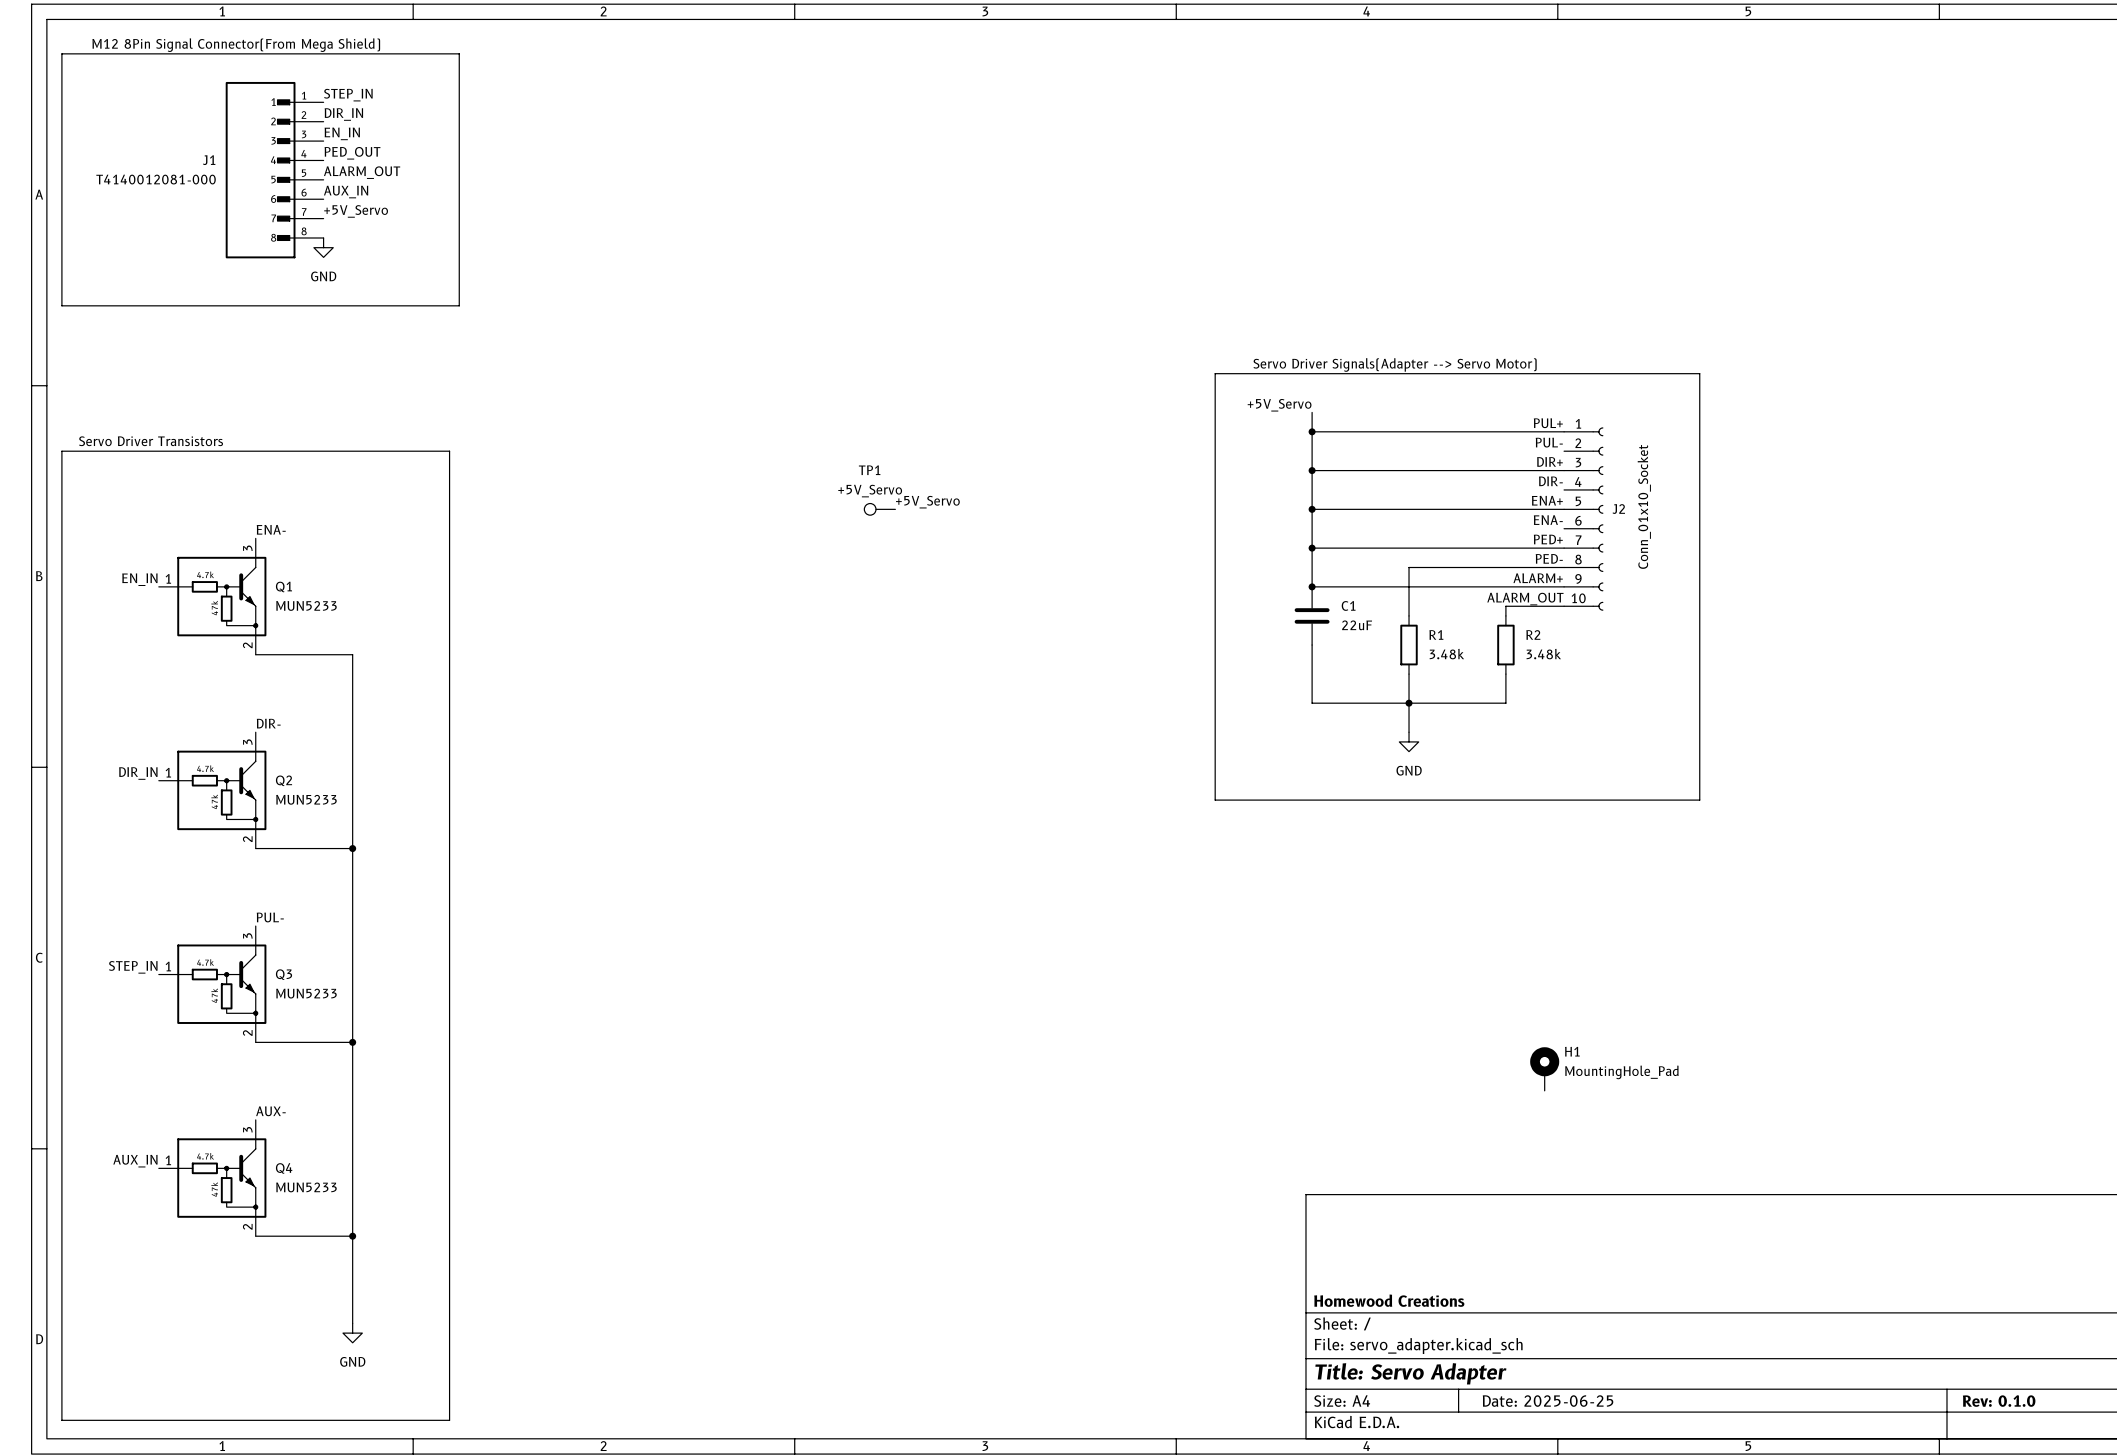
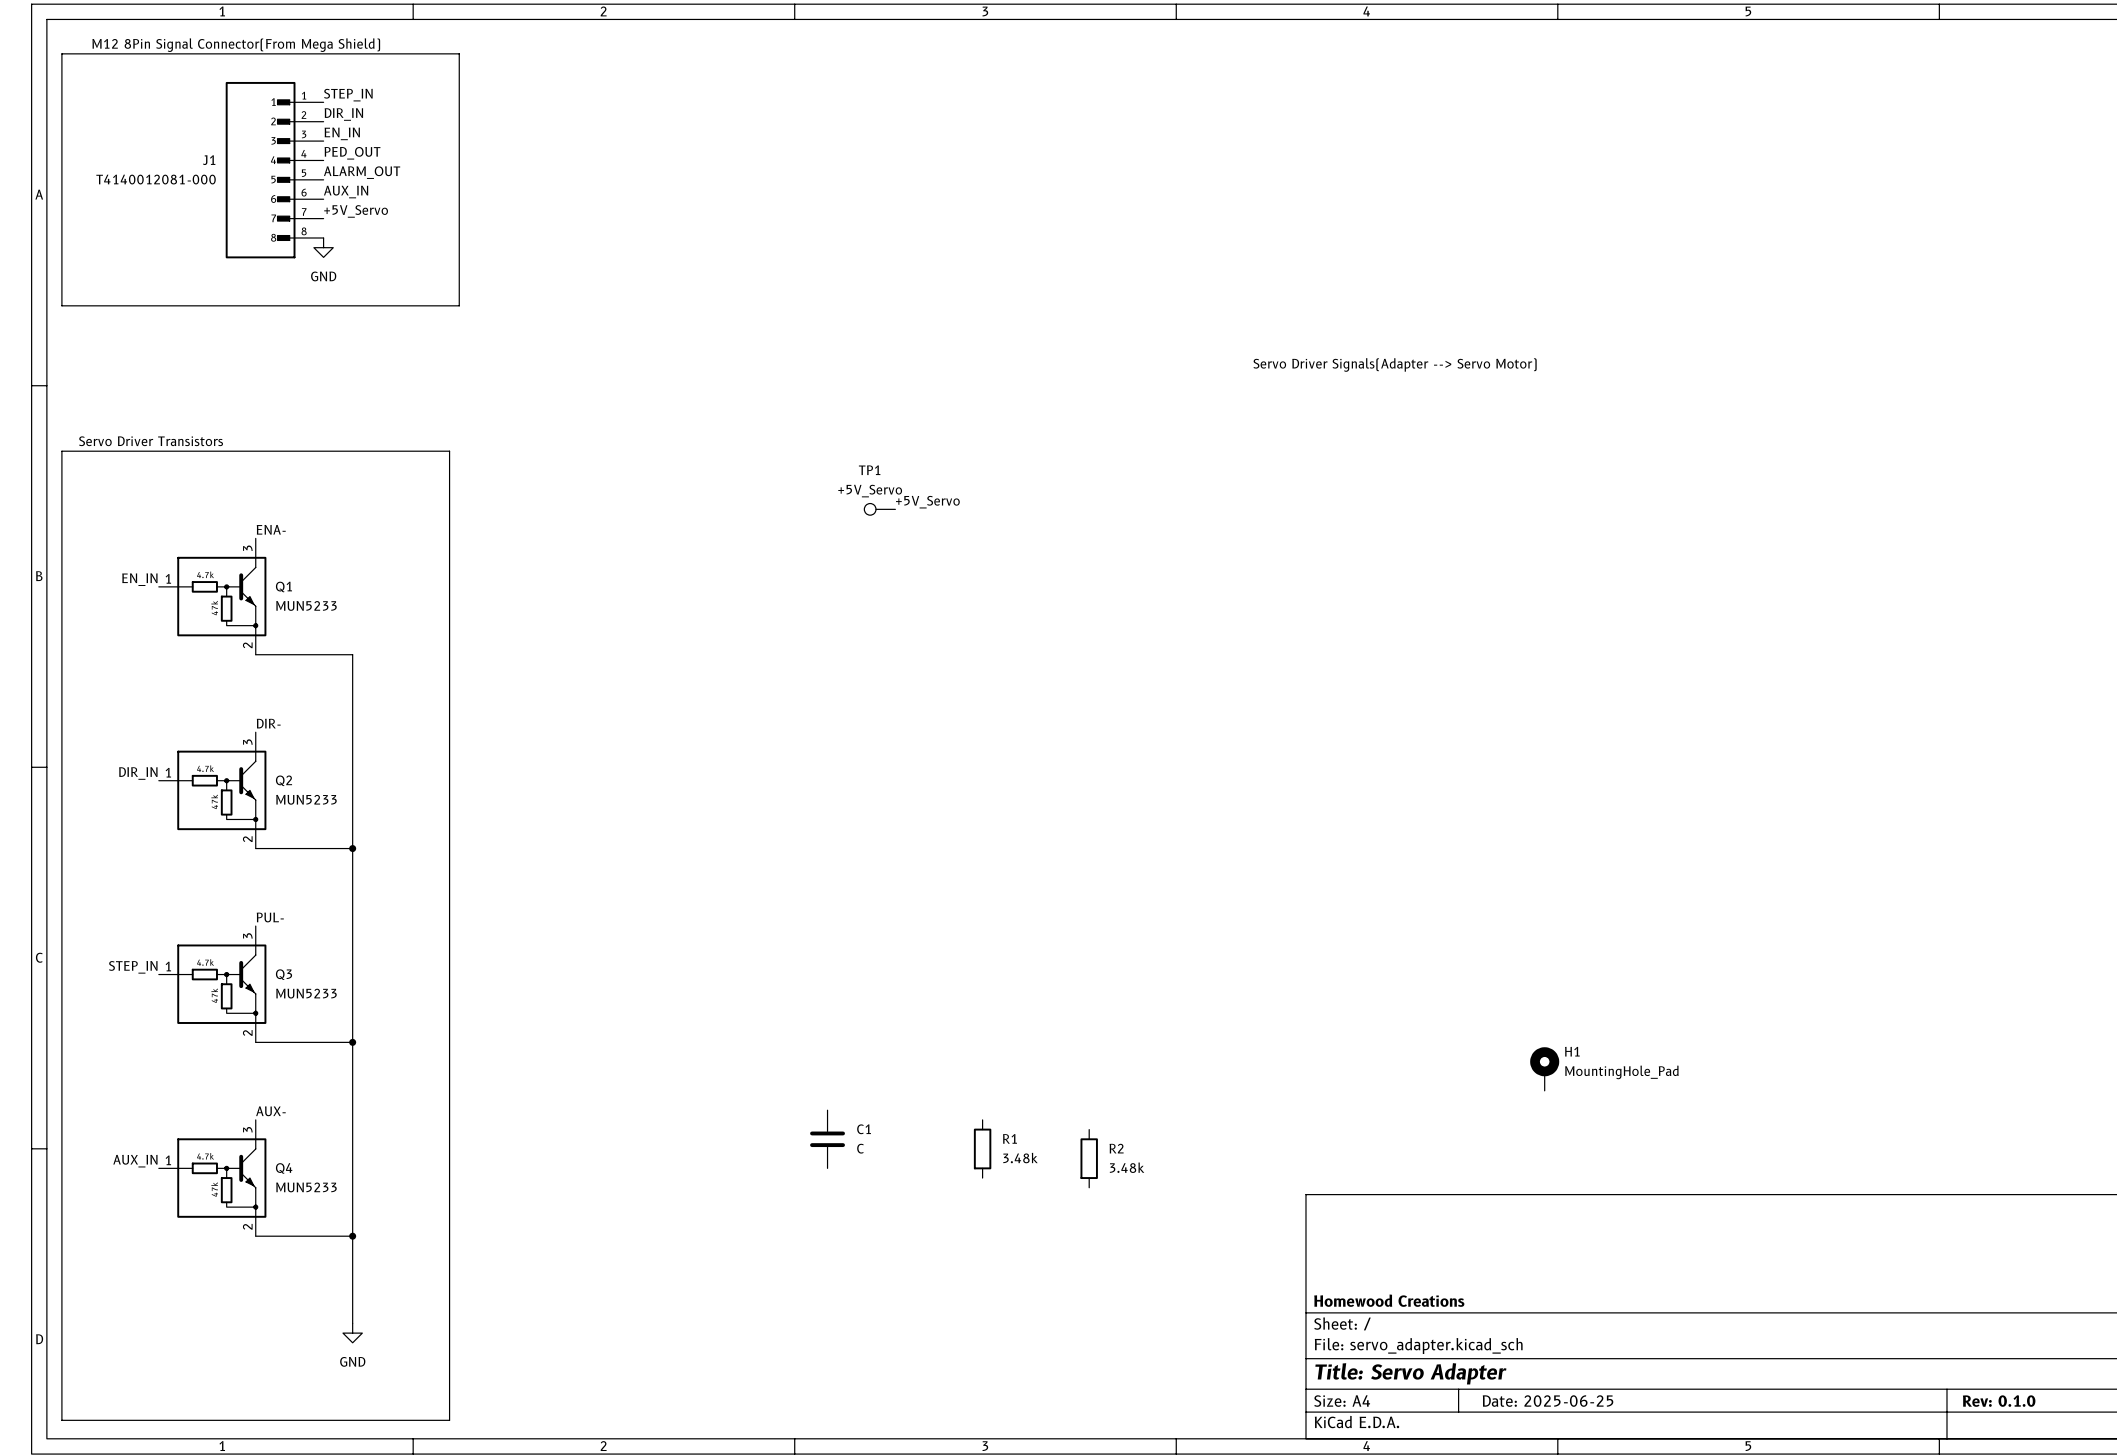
line: (1215, 373) (1699, 373) (1699, 800) (1215, 800) (1215, 373) -> none
label: +5V_Servo (1279, 405) -> none
wire: (1312, 412) (1312, 586) (1564, 586) -> none
label: PUL+ (1548, 423) -> none
wire: (1312, 431) (1564, 431) -> none
junction: (1312, 431) -> none
label: PUL- (1549, 442) -> none
label: DIR+ (1549, 461) -> none
wire: (1312, 470) (1564, 470) -> none
junction: (1312, 470) -> none
label: DIR- (1550, 481) -> none
label: ENA+ (1547, 500) -> none
wire: (1312, 509) (1564, 509) -> none
junction: (1312, 509) -> none
J2: Conn_01x10_Socket (1583, 519) -> none
label: ENA- (1548, 520) -> none
label: PED+ (1548, 539) -> none
wire: (1312, 548) (1564, 548) -> none
junction: (1312, 548) -> none
label: PED- (1549, 558) -> none
wire: (1564, 567) (1409, 567) (1409, 615) -> none
label: ALARM+ (1538, 578) -> none
junction: (1312, 586) -> none
label: ALARM_OUT (1525, 599) -> none
wire: (1564, 606) (1505, 606) (1505, 615) -> none
C1 position: (1312, 615) -> (827, 1139)
C1 value: 22uF (1357, 625) -> C (860, 1148)
wire: (1312, 645) (1312, 703) (1505, 703) (1505, 674) -> none
R1 position: (1409, 645) -> (982, 1148)
R2 position: (1505, 645) -> (1089, 1158)
wire: (1409, 674) (1409, 732) -> none
junction: (1409, 703) -> none
power symbol: GND (1409, 741) -> none

